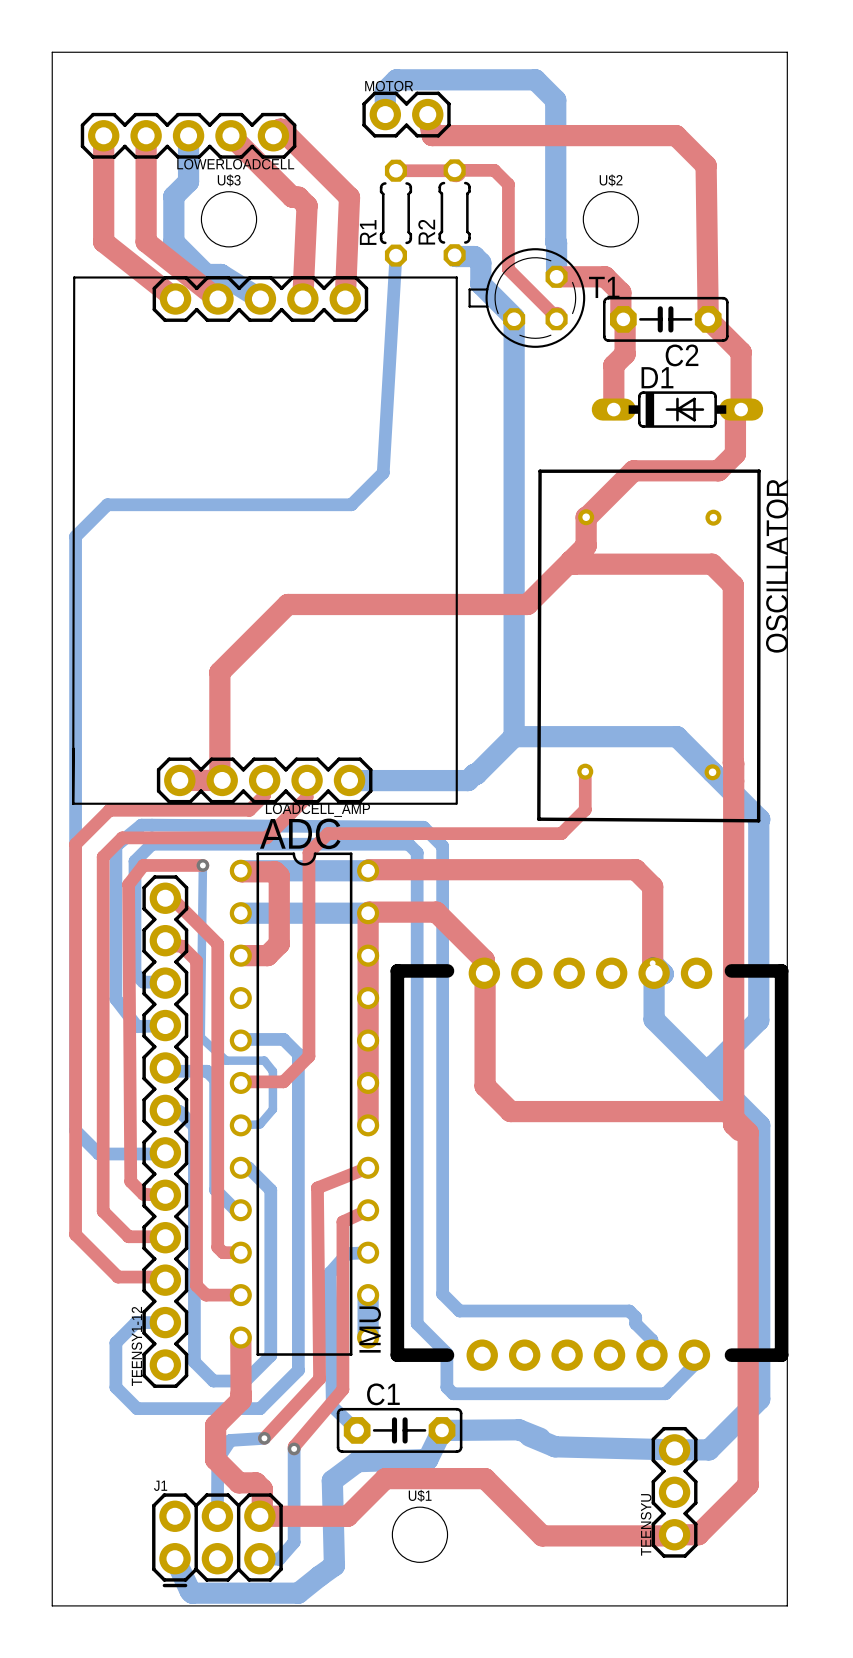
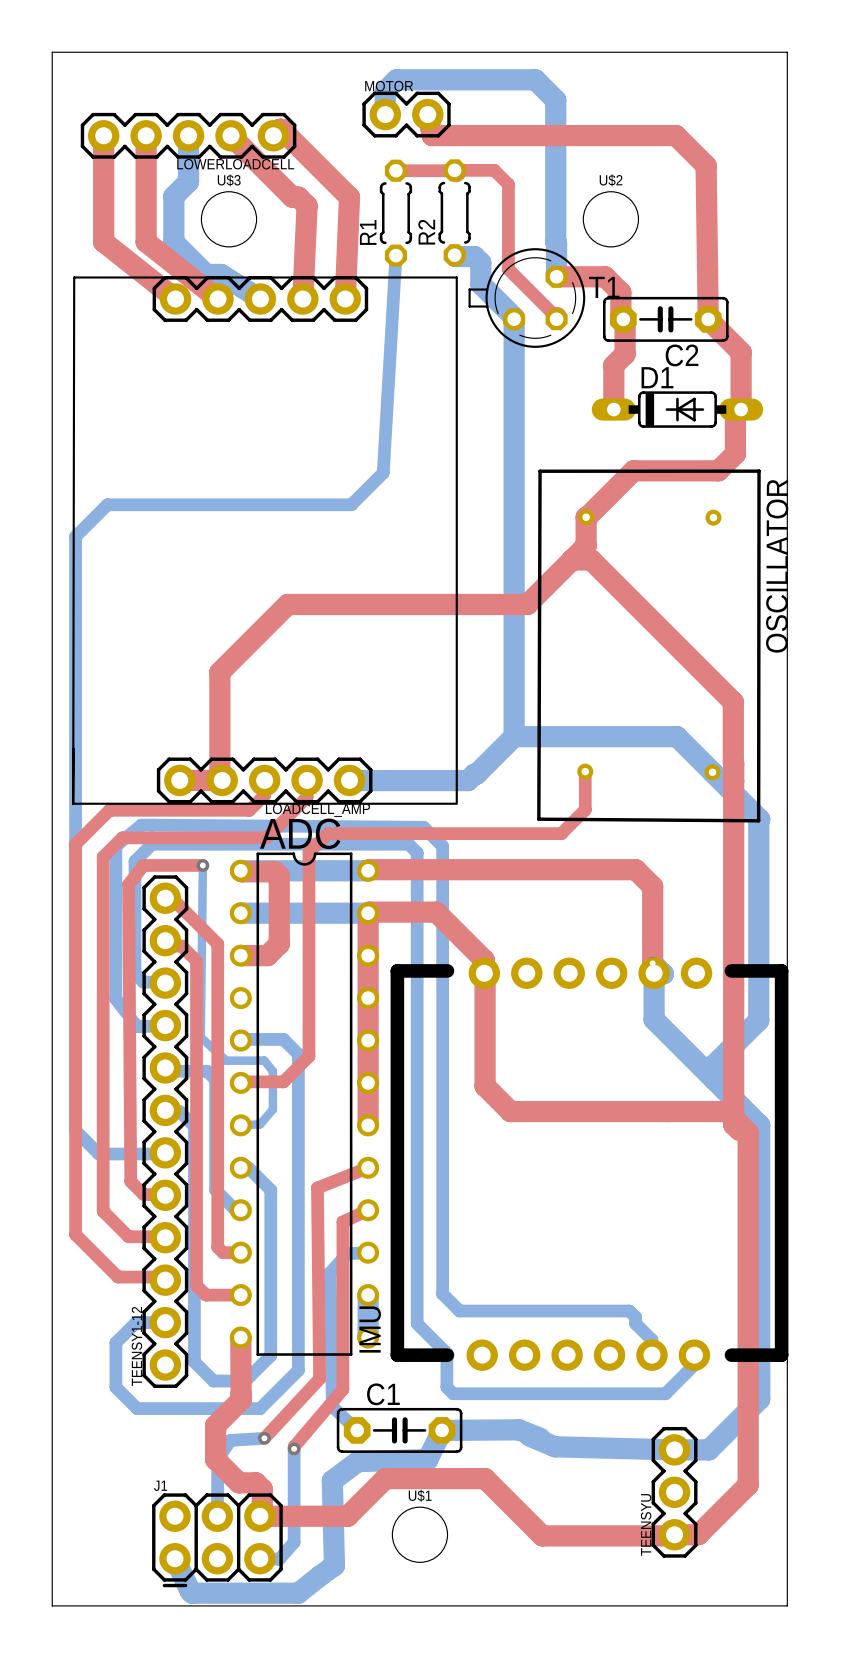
top track: (571, 560) (574, 564) (712, 564) (733, 585) (733, 702) -> (572, 559) (591, 559) (733, 702)

